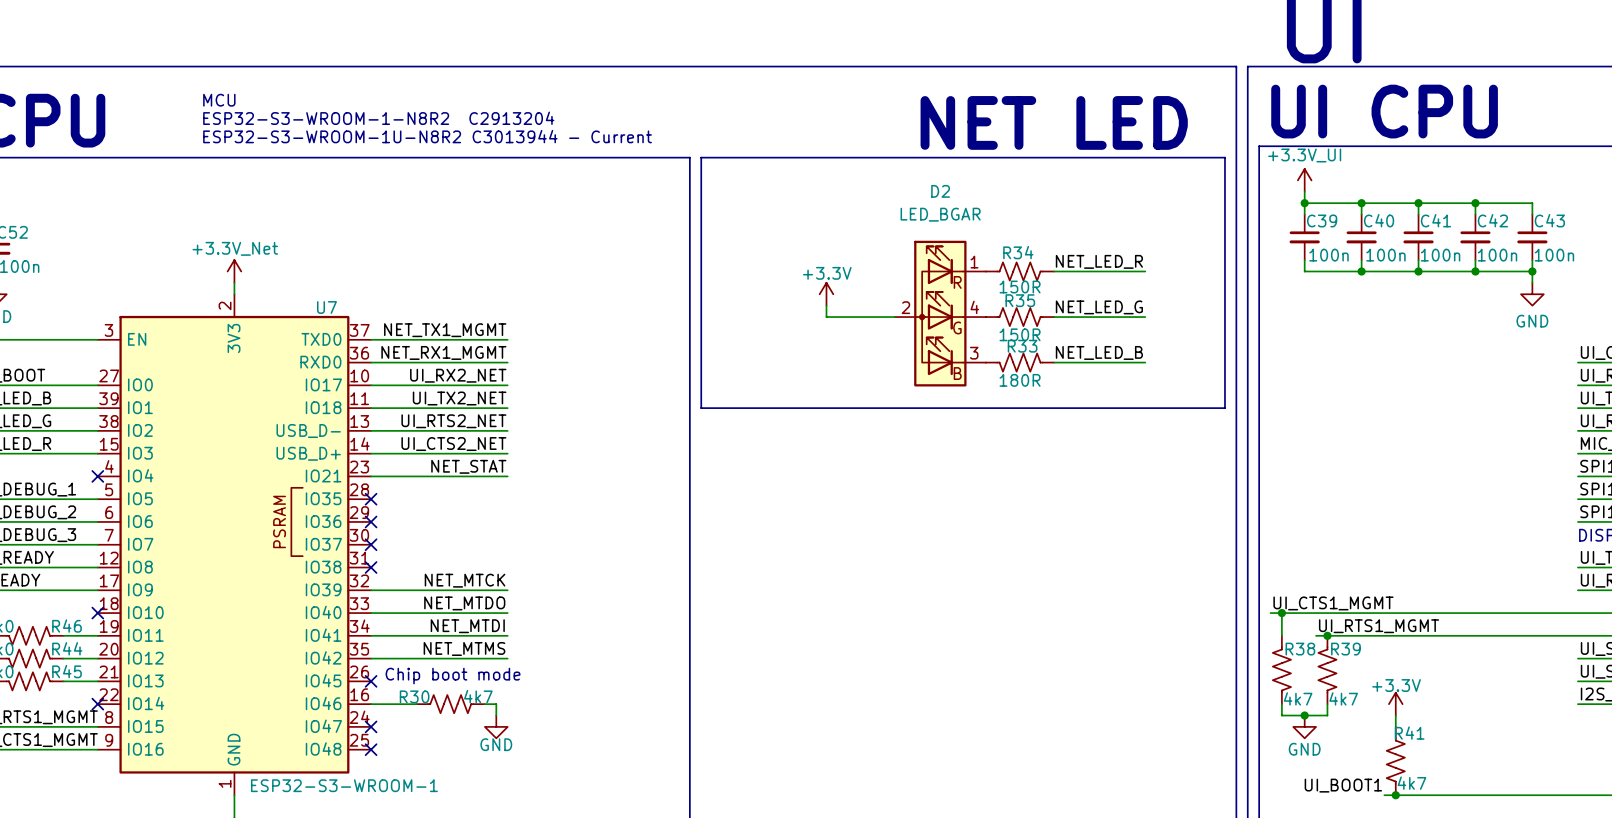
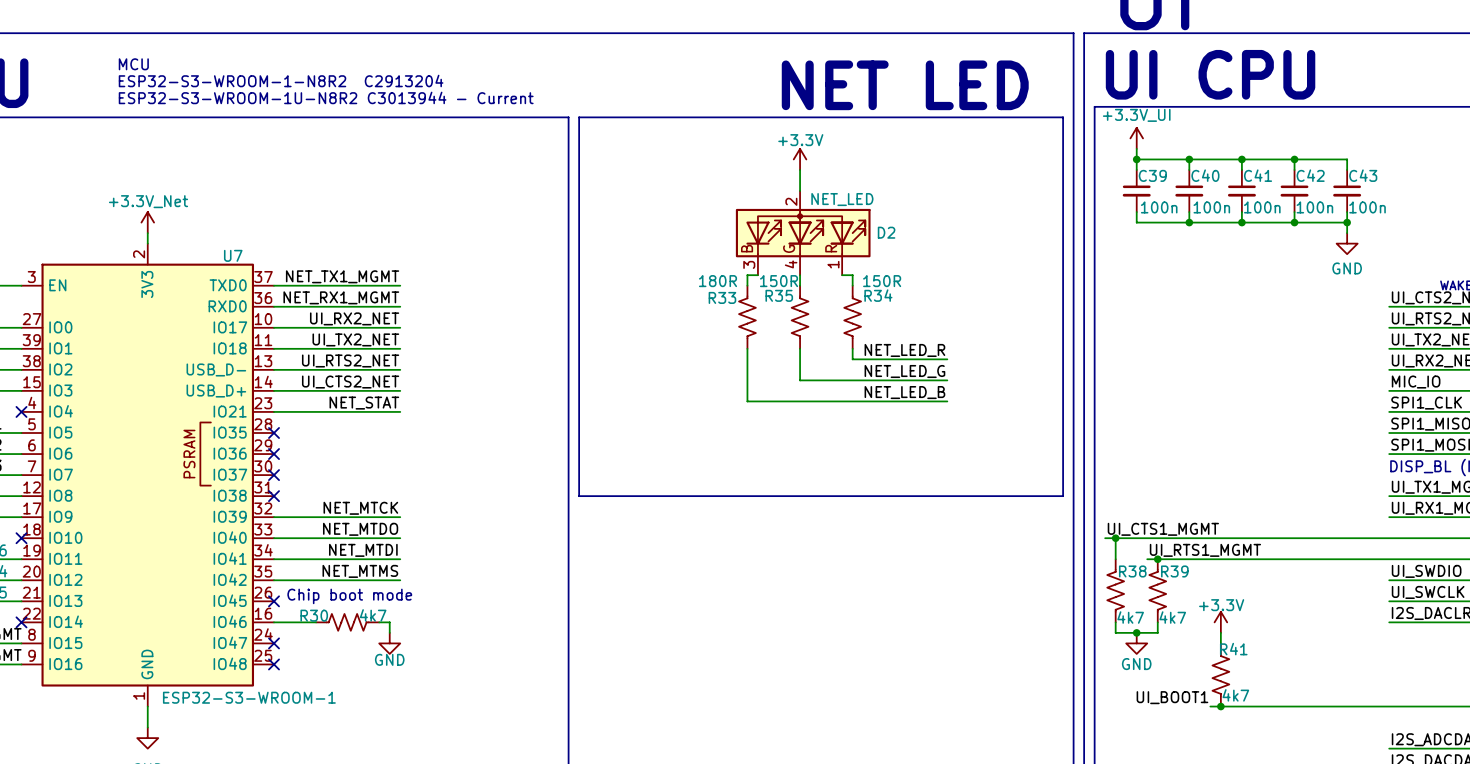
D2 name position: D2 (940, 191) -> D2 (886, 232)
wire: none -> (800, 169) (800, 191)
D2 value: LED_BGAR (940, 214) -> NET_LED (842, 199)
R34 name position: R34 (1018, 252) -> R34 (878, 295)
label position: NET_LED_R (1099, 261) -> NET_LED_R (904, 350)
R34 rotation: 0° (1020, 271) -> 90° clockwise (852, 317)
R34 position: (1020, 271) -> (852, 317)
wire: (1054, 271) (1145, 271) -> none
R34 value position: 150R (1020, 287) -> 150R (882, 281)
power symbol position: +3.3V (826, 294) -> +3.3V (800, 159)
R35 name position: R35 (1020, 300) -> R35 (779, 295)
wire: (826, 305) (826, 317) (894, 317) -> none
label position: NET_LED_G (1099, 307) -> NET_LED_G (904, 371)
D2 rotation: 0° (940, 313) -> 90° clockwise (803, 233)
R35 rotation: 0° (1020, 317) -> 90° clockwise (800, 317)
R35 position: (1020, 317) -> (800, 317)
wire: (1054, 317) (1145, 317) -> none
wire: none -> (757, 275) (747, 275) (747, 285)
wire: none -> (842, 275) (852, 275) (852, 285)
R35 value position: 150R (1020, 334) -> 150R (779, 281)
R33 name position: R33 (1022, 346) -> R33 (722, 297)
label position: NET_LED_B (1099, 352) -> NET_LED_B (904, 392)
R33 rotation: 0° (1020, 362) -> 90° clockwise (747, 317)
R33 position: (1020, 362) -> (747, 317)
wire: (1054, 362) (1145, 362) -> none
R33 value position: 180R (1020, 380) -> 180R (717, 281)
line: (701, 408) (1224, 408) -> (579, 348) (579, 496) (1063, 496) (1063, 348)
wire: none -> (747, 348) (747, 401) (947, 401)
wire: none -> (800, 348) (800, 380) (947, 380)
wire: none -> (852, 348) (852, 359) (947, 359)

